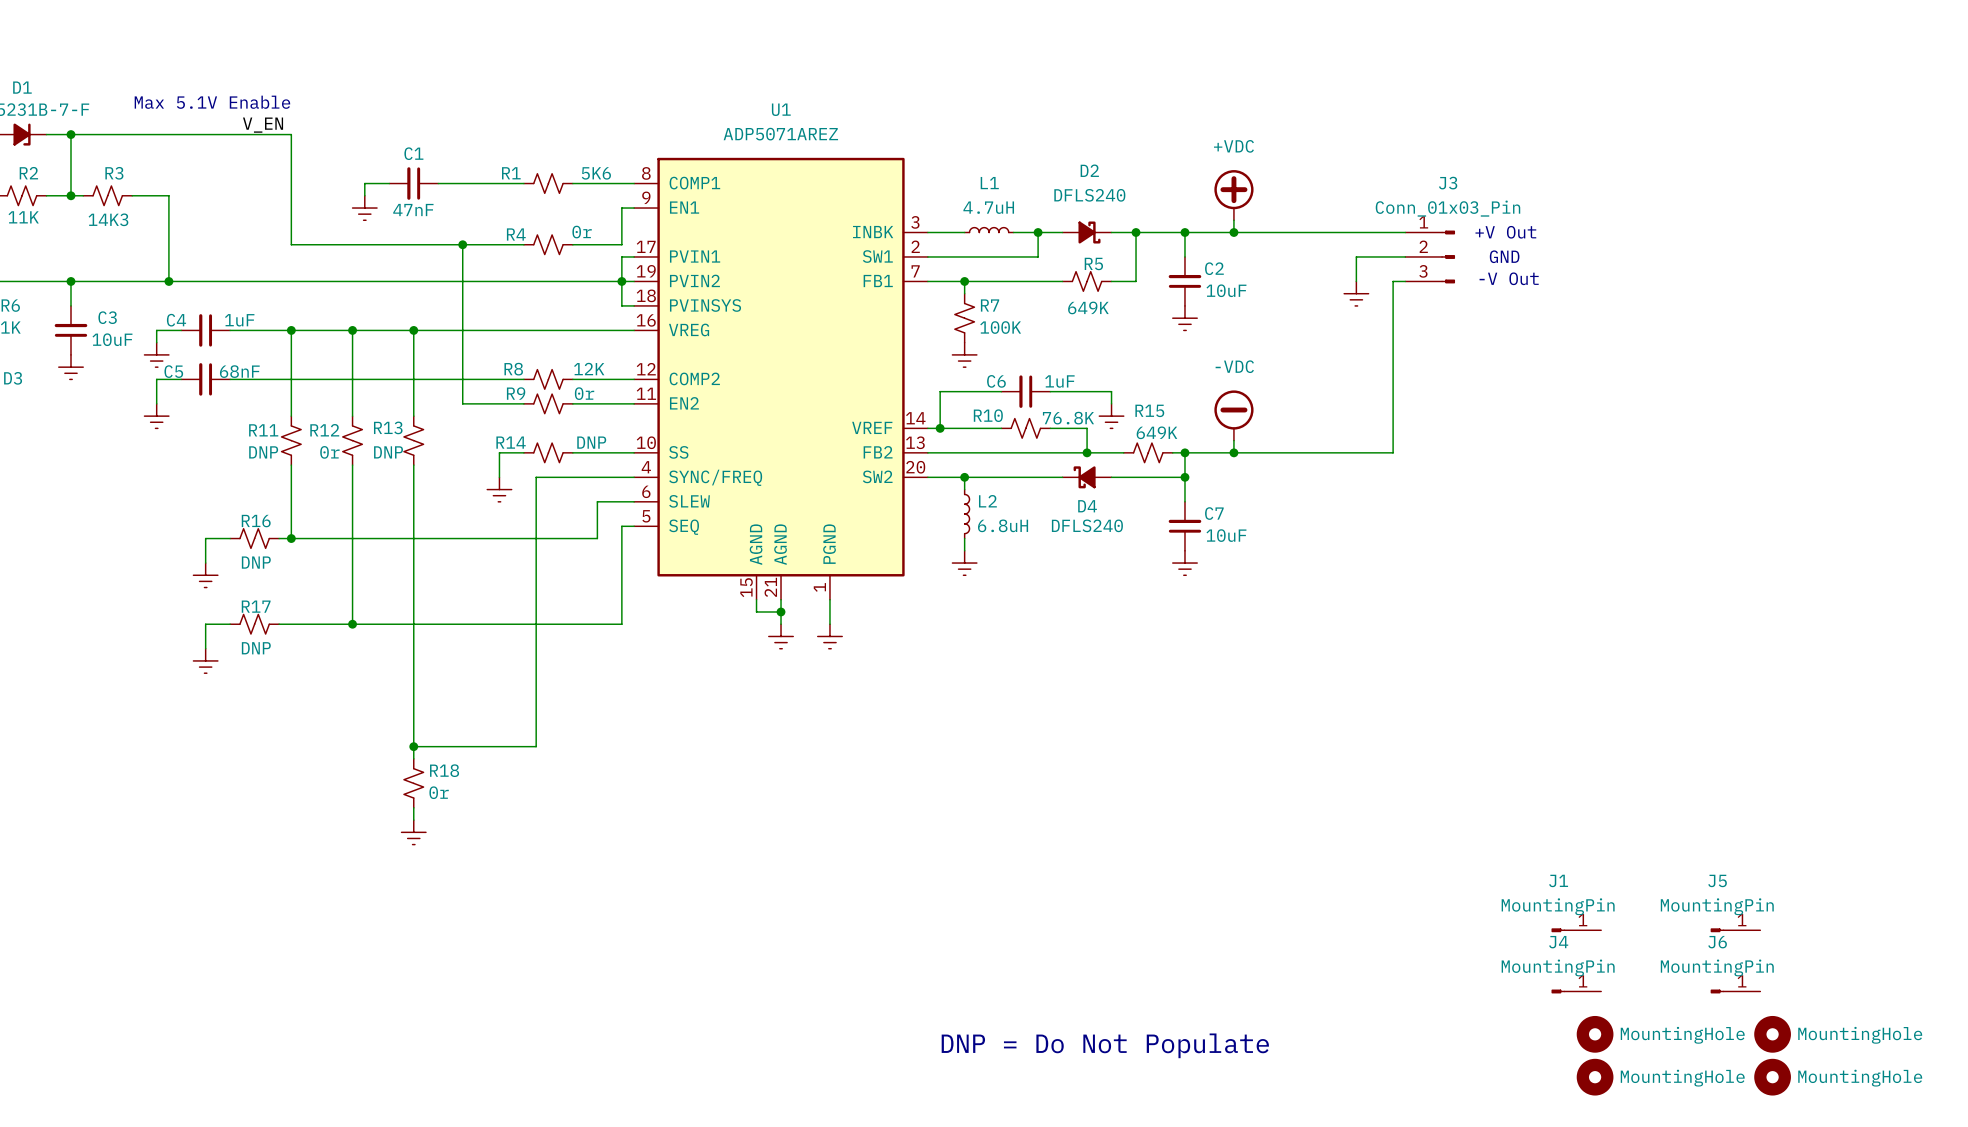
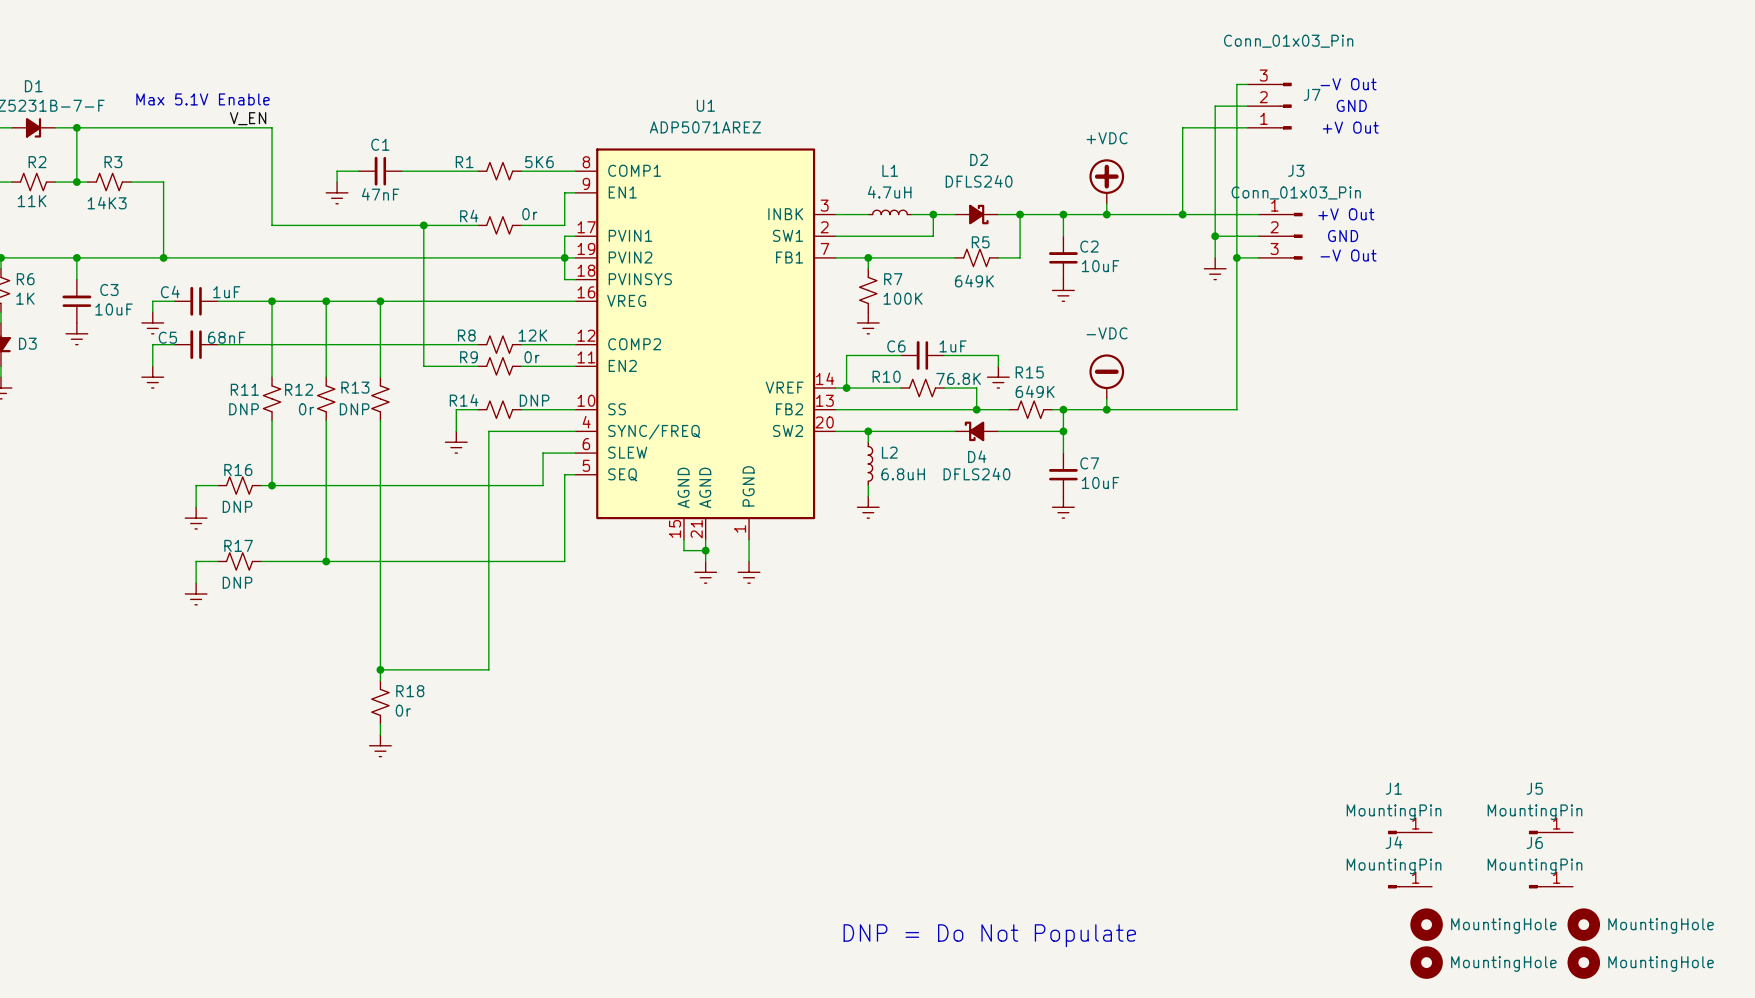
wire: none -> (1247, 84) (1236, 84) (1236, 409)
text: none -> -V Out (1348, 84)
text: none -> GND (1351, 105)
wire: none -> (1247, 106) (1215, 106) (1215, 236)
J7: none -> Conn_01x03_Pin (1269, 106)
wire: none -> (1247, 127) (1182, 127) (1182, 214)
text: none -> +V Out (1350, 127)
junction: none -> (1182, 214)
junction: none -> (1215, 236)
junction: none -> (1236, 257)
wire: (1393, 281) (1393, 452) (1380, 452) -> (1247, 257) (1236, 257)

